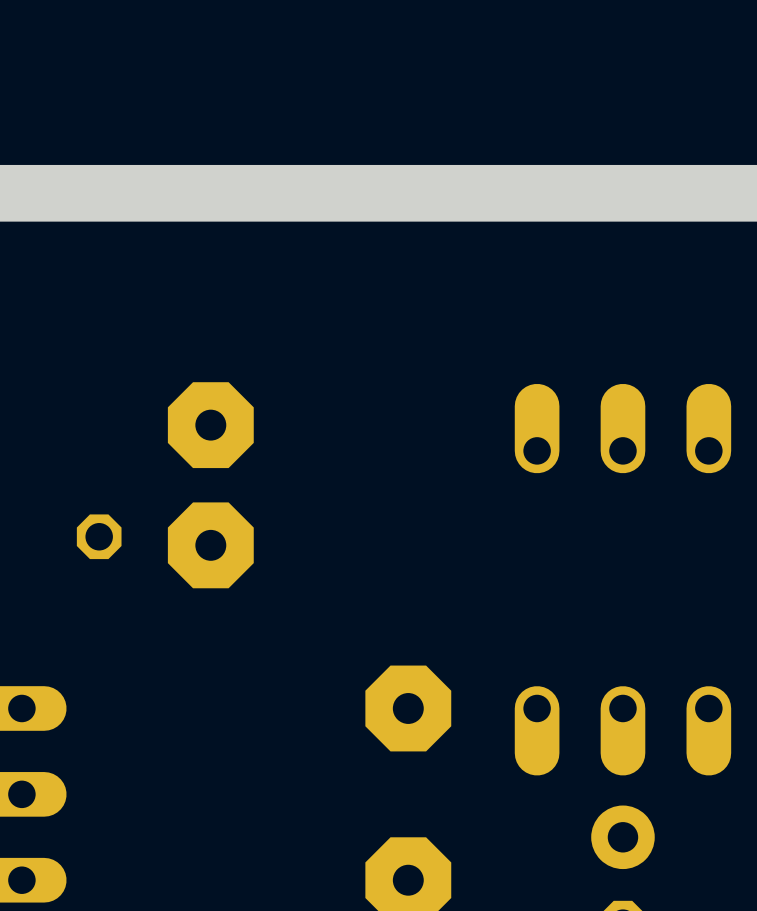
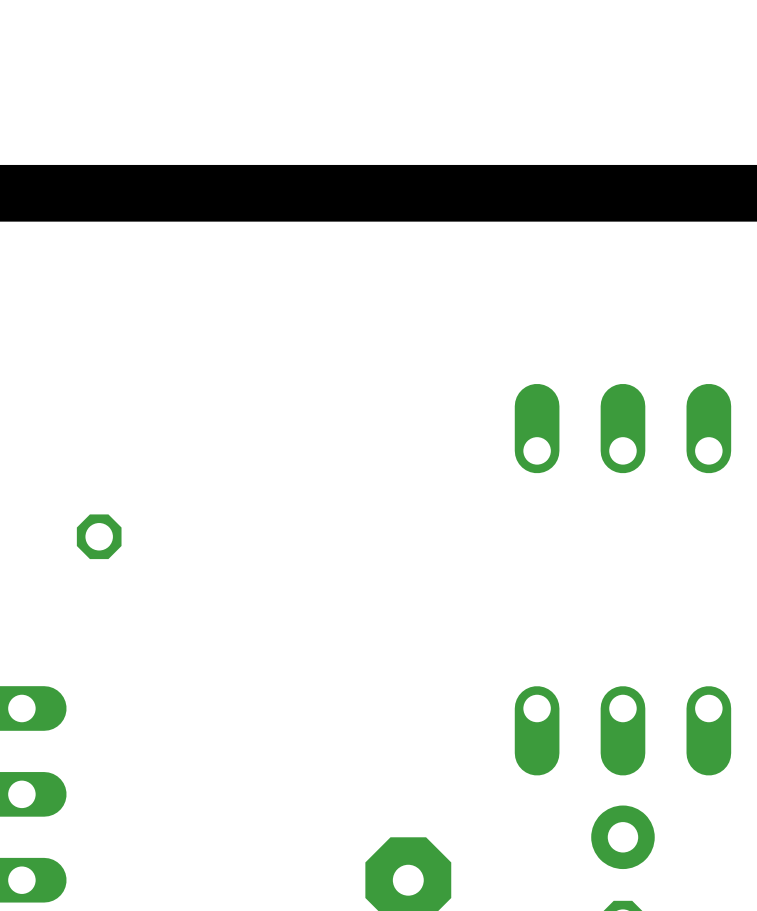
part: (210, 425) -> none
part: (210, 545) -> none
part: (408, 708) -> none

